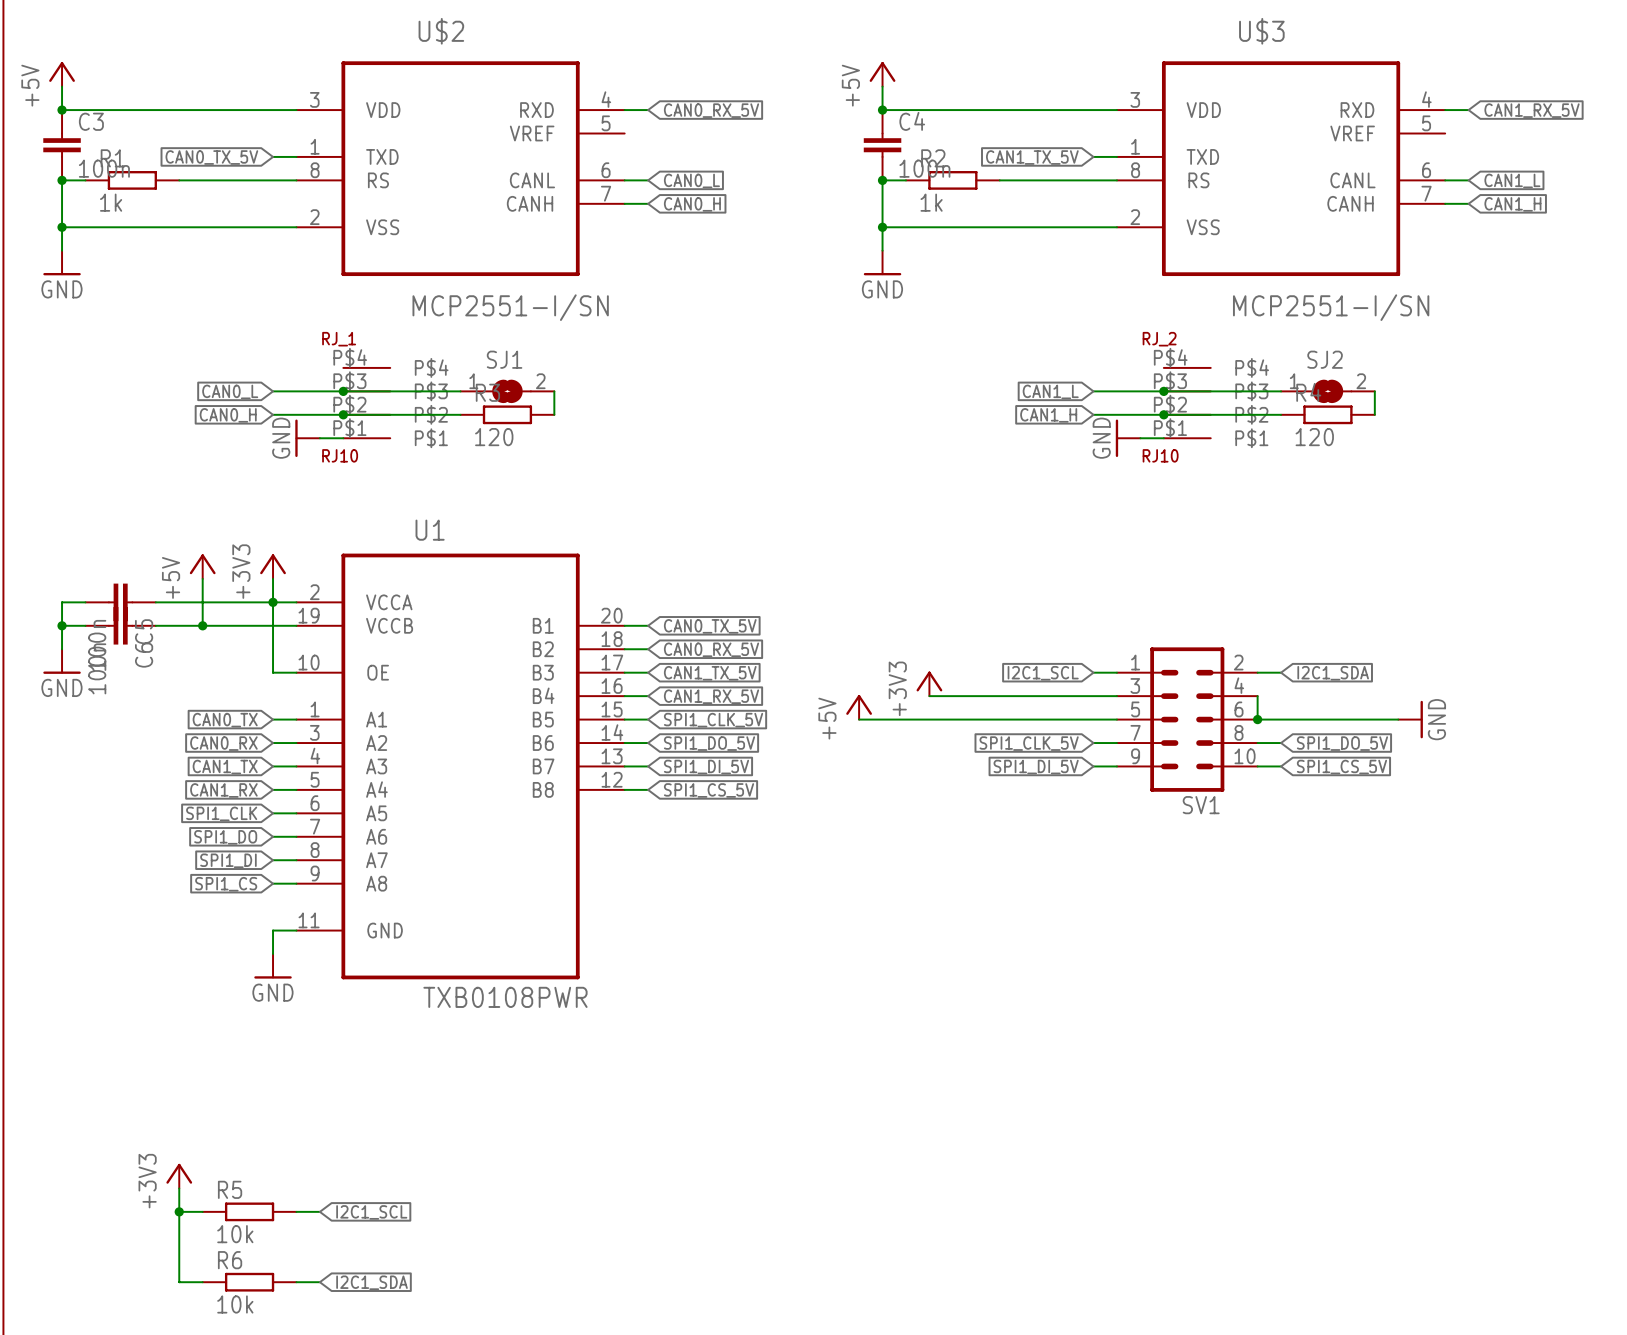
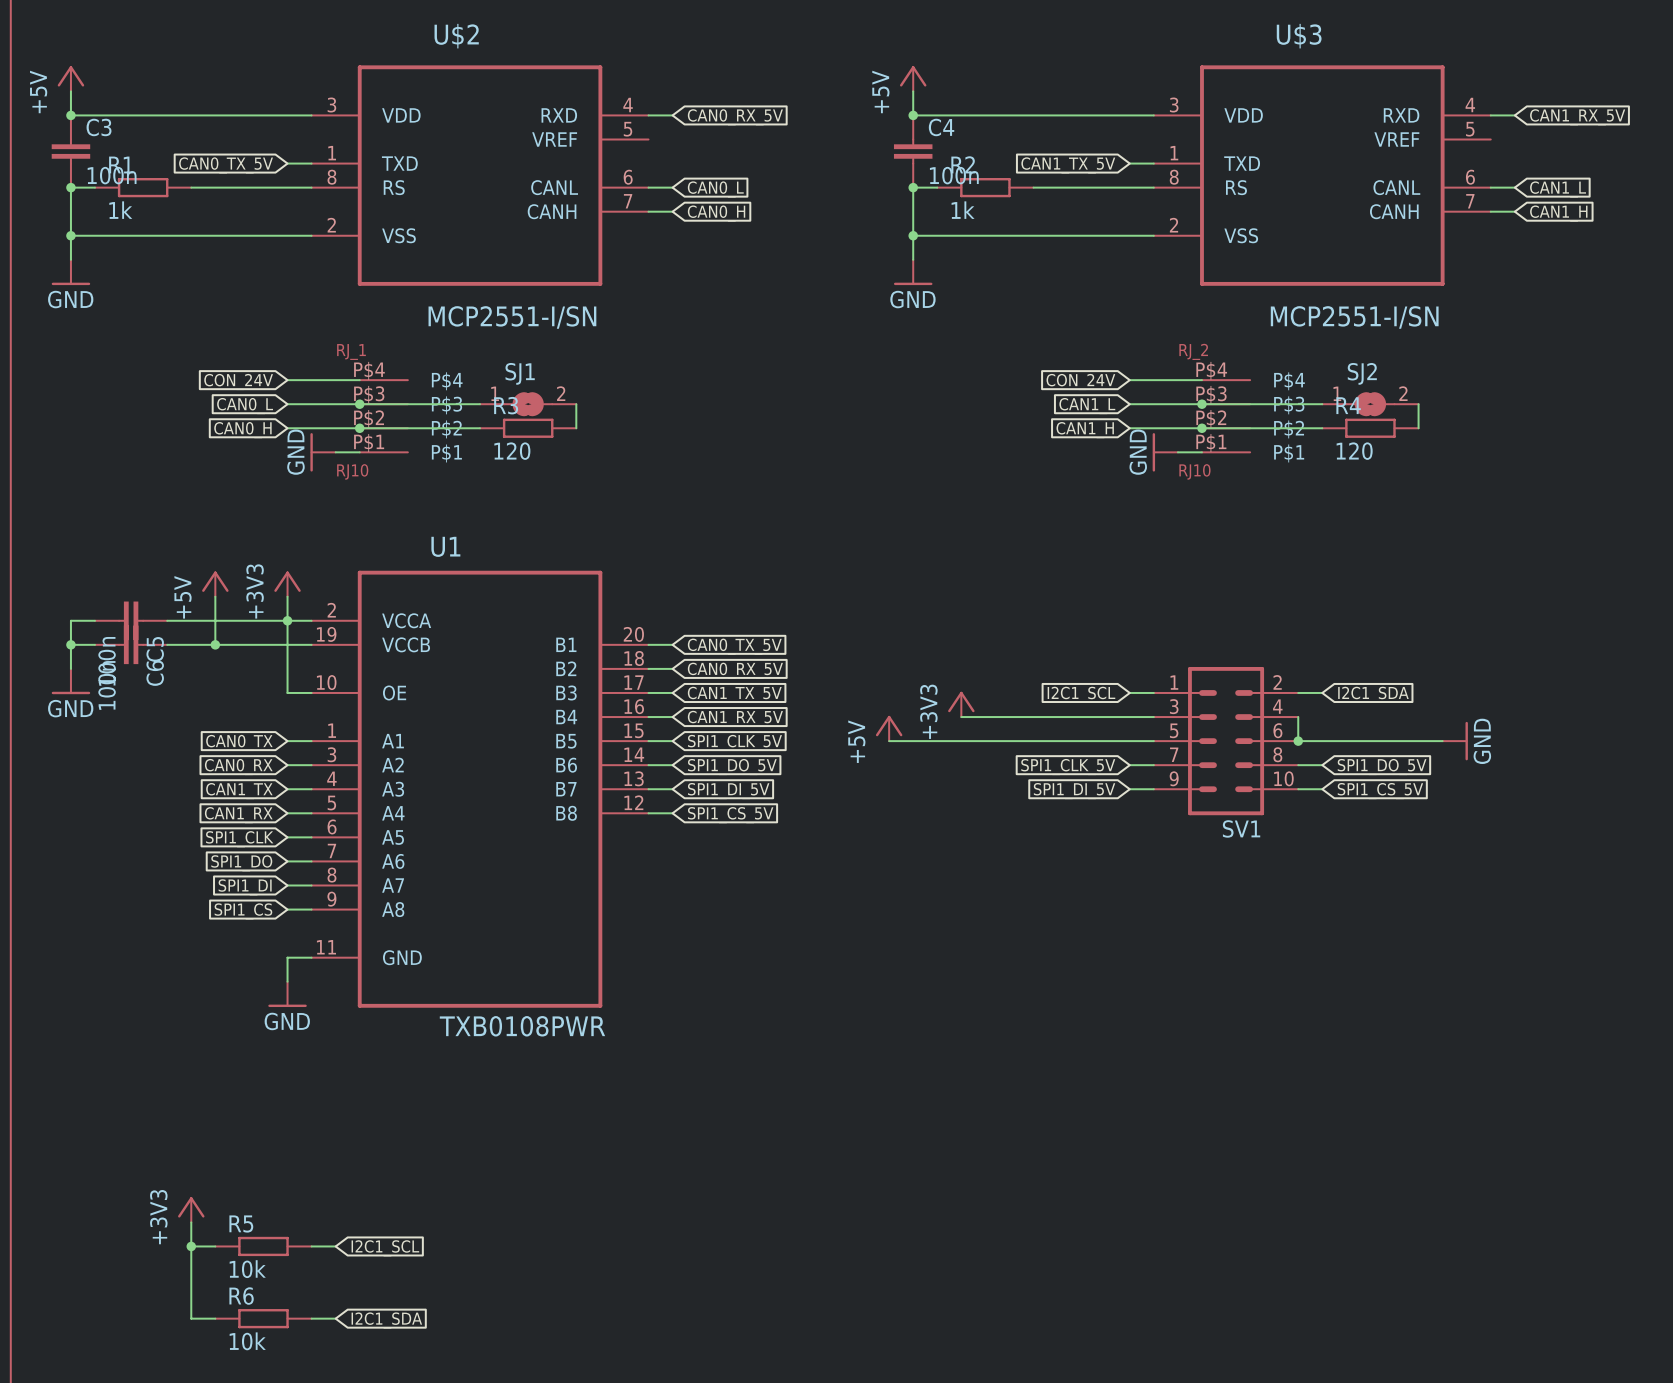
wire: none -> (287, 380) (359, 380)
wire: none -> (1129, 380) (1201, 380)
global label: none -> CON_24V (238, 381)
global label: none -> CON_24V (1080, 381)

